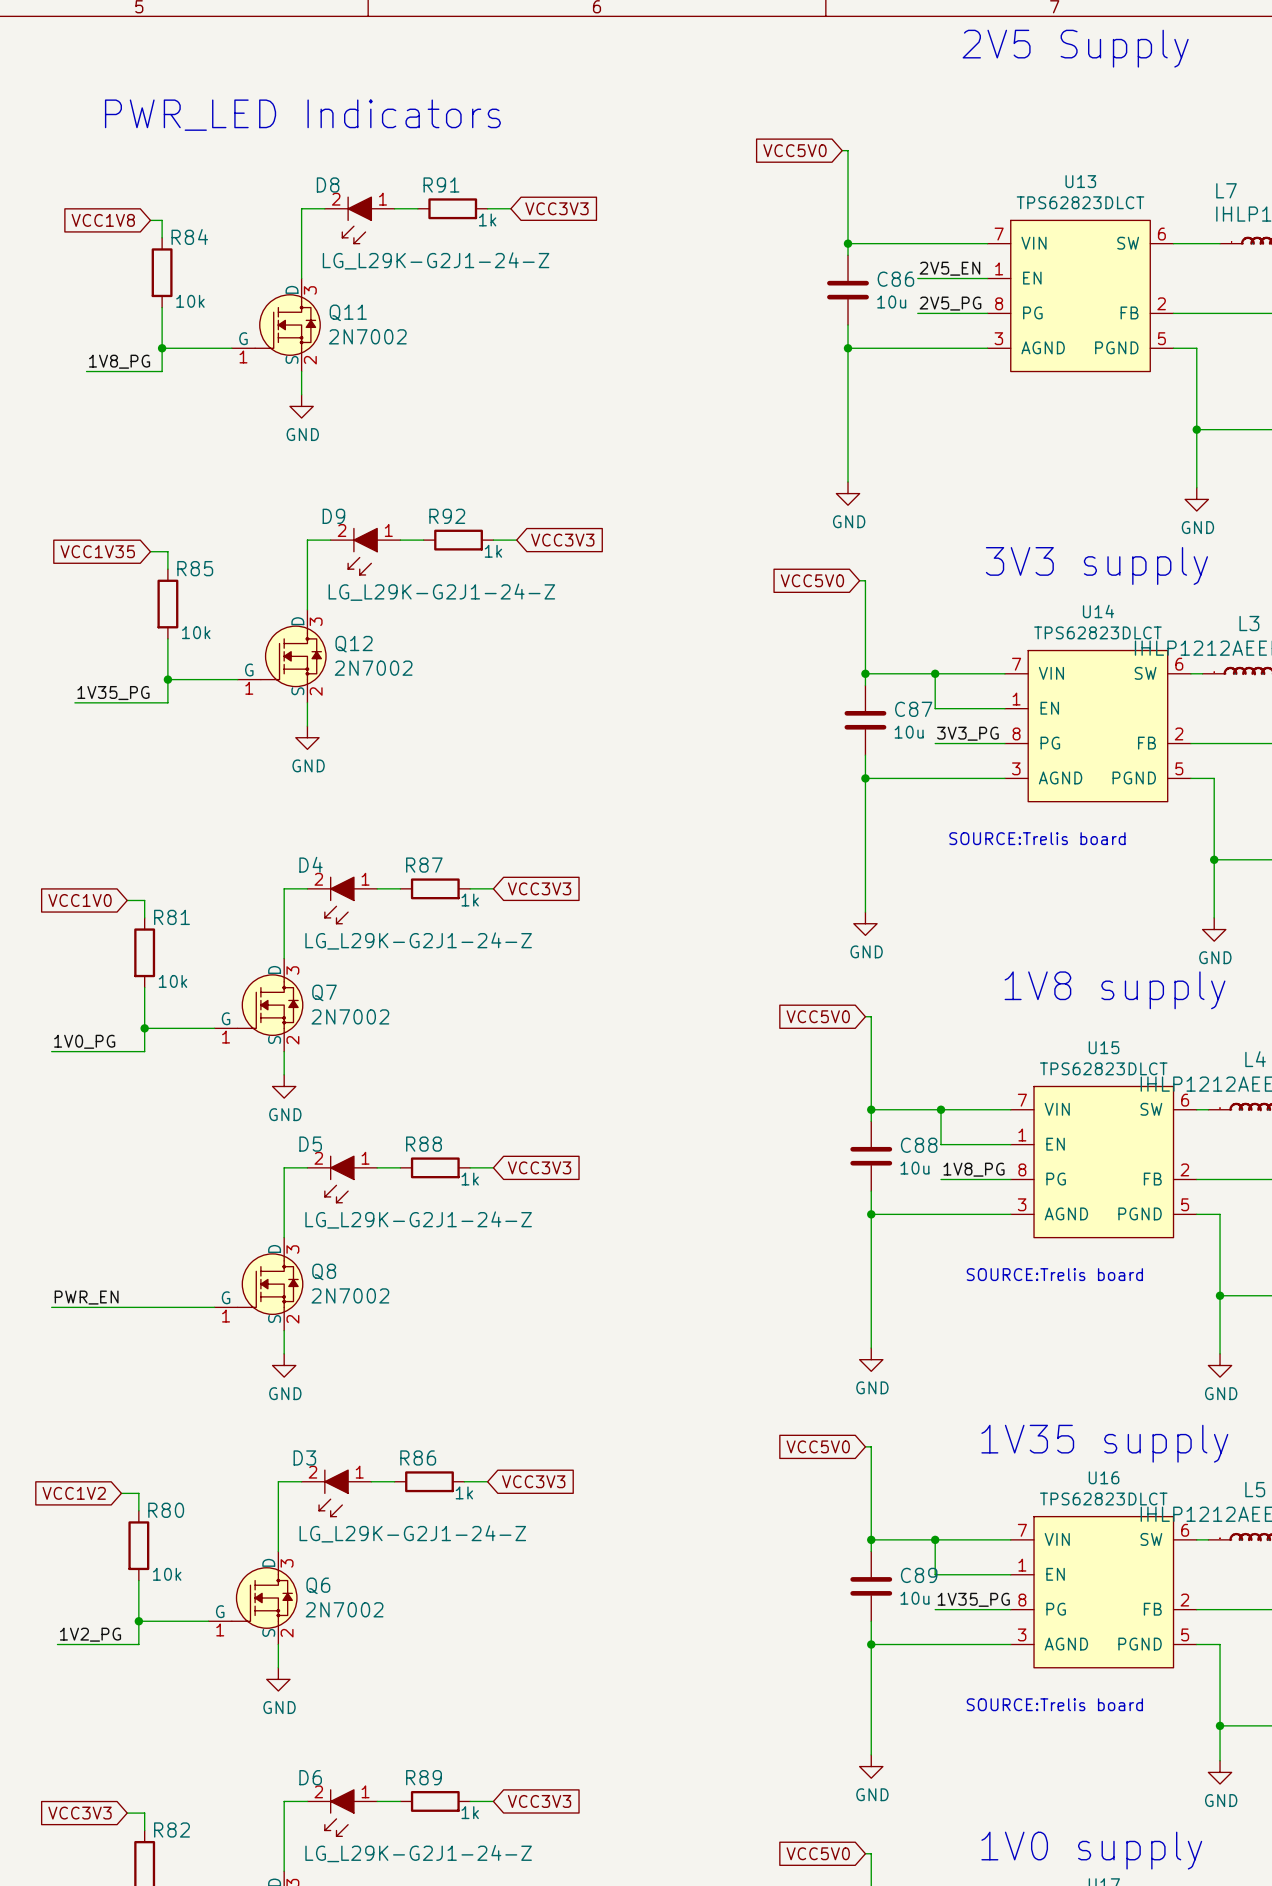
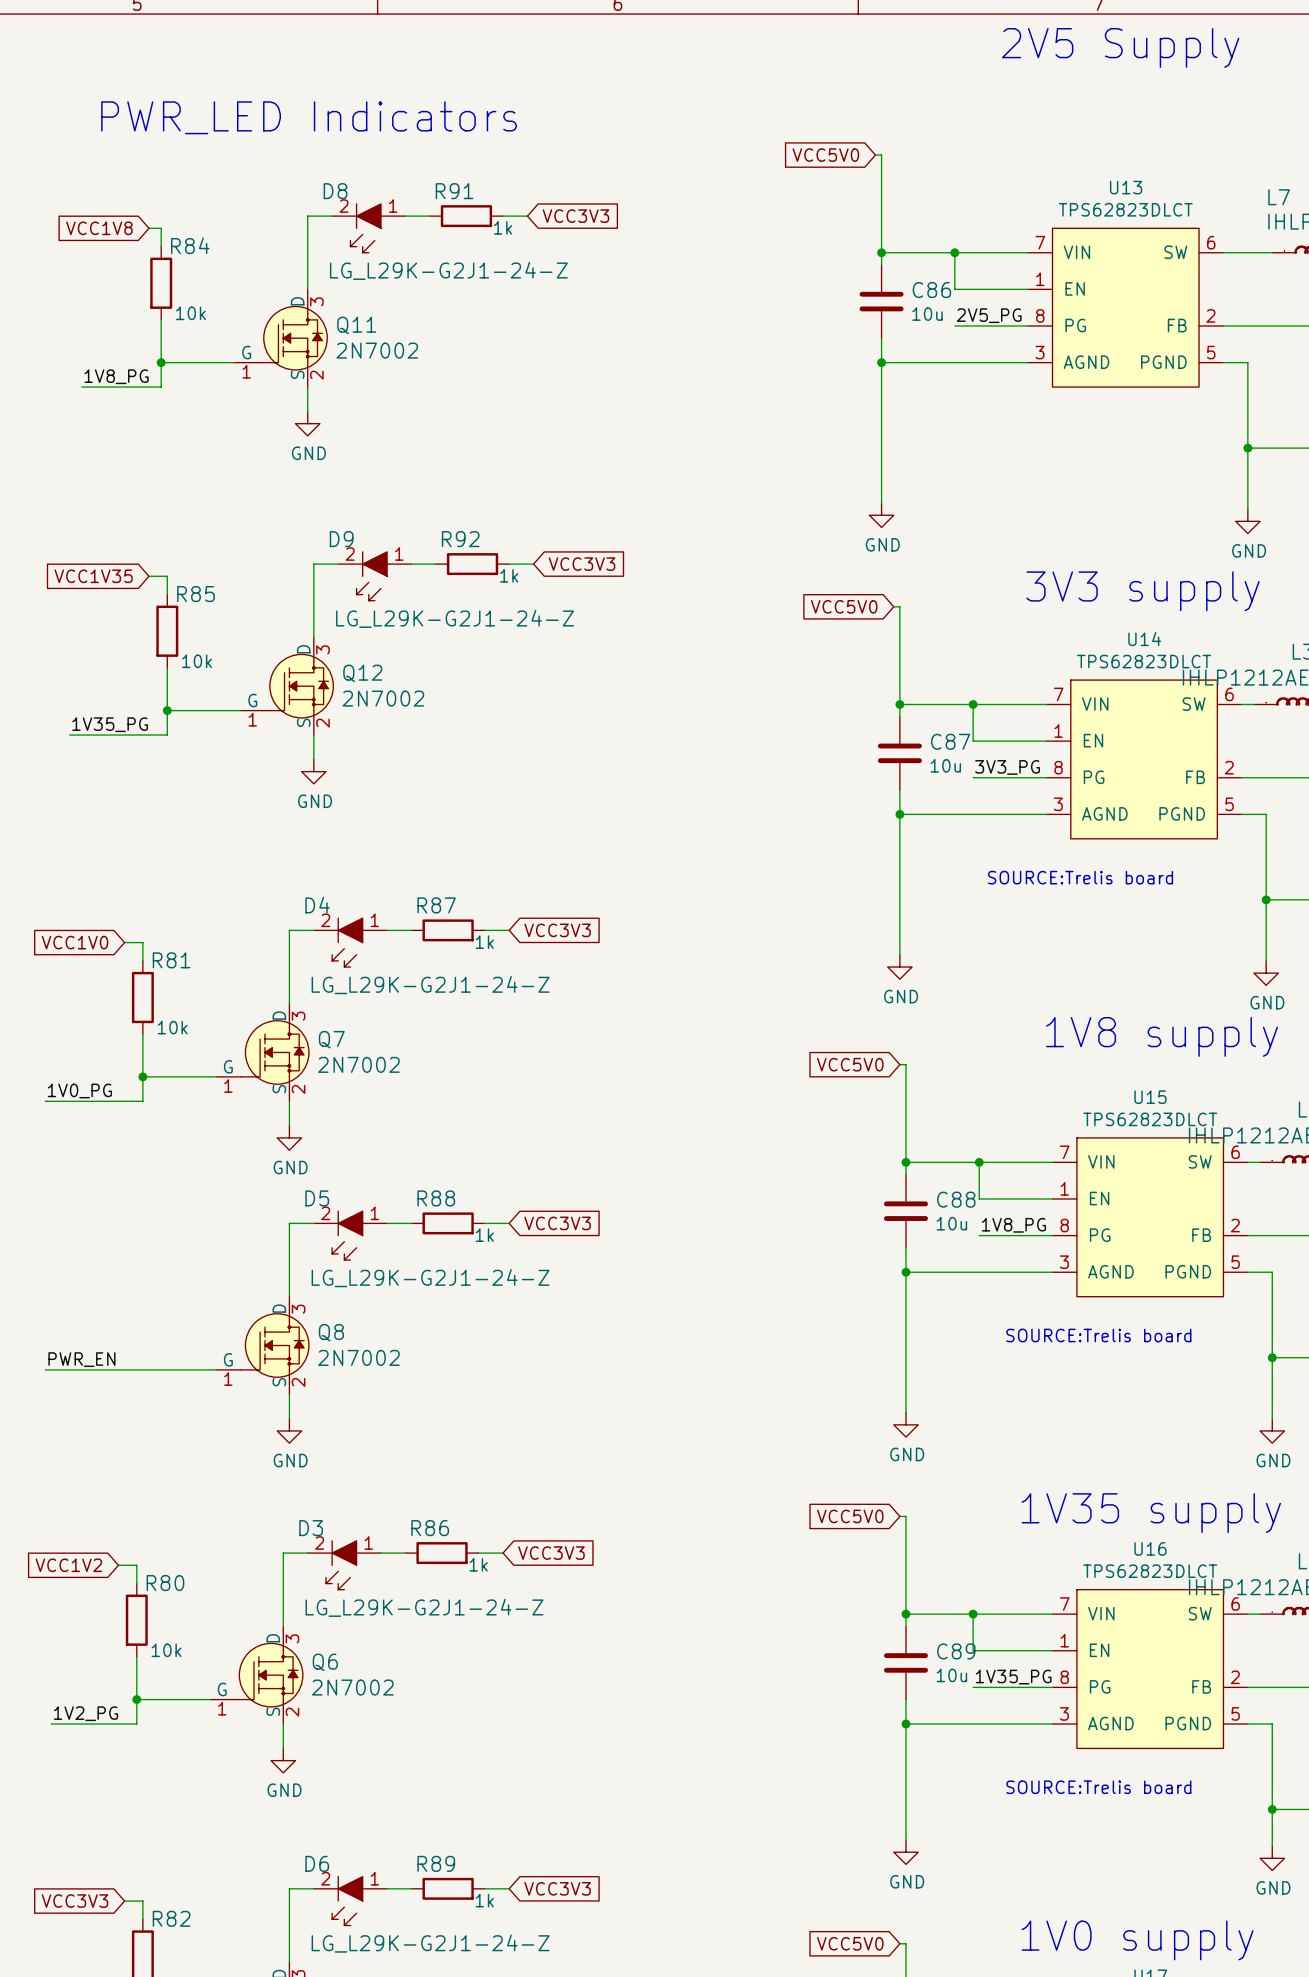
wire: none -> (954, 252) (954, 289)
junction: none -> (954, 252)
label: 2V5_EN (949, 268) -> none

